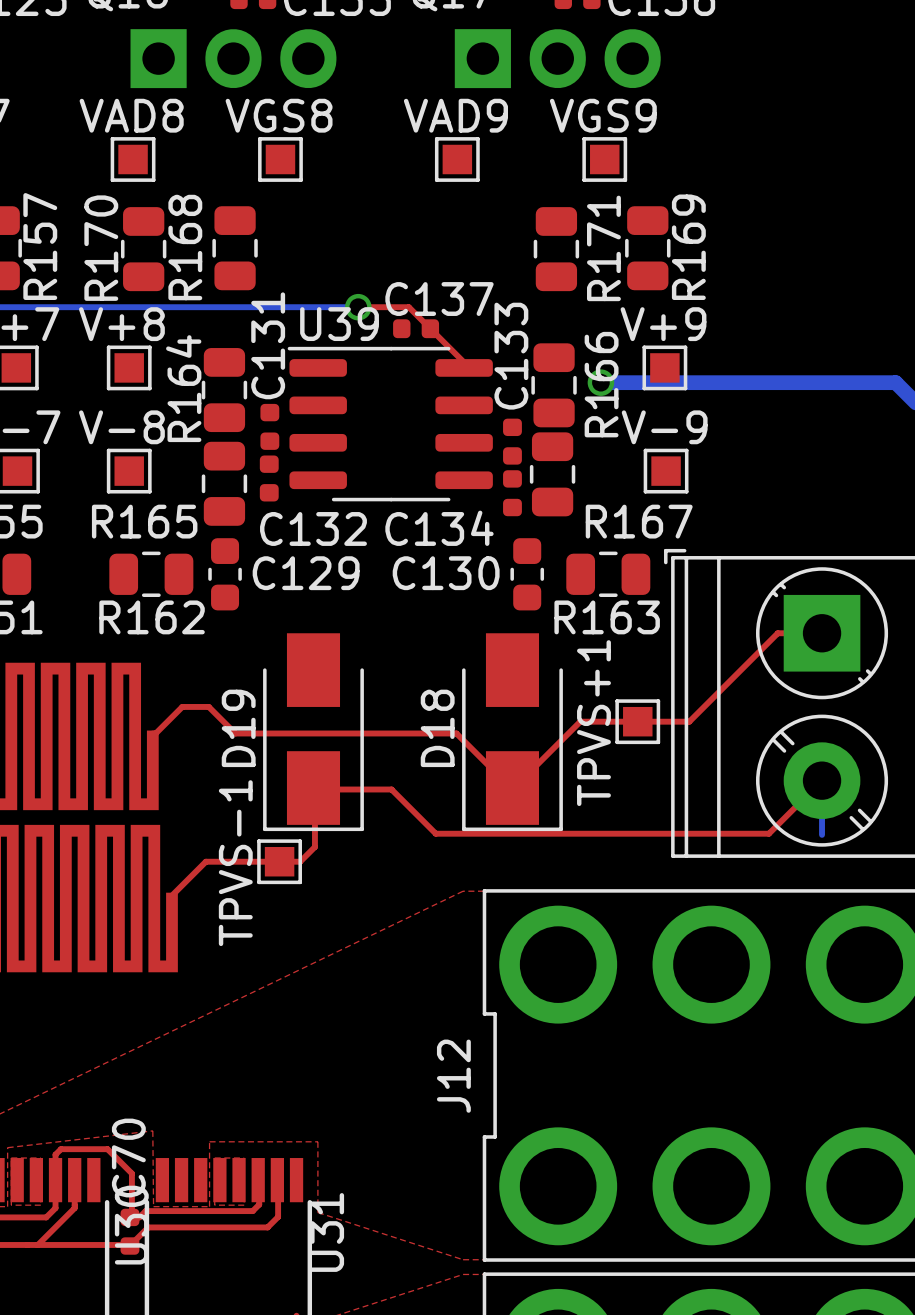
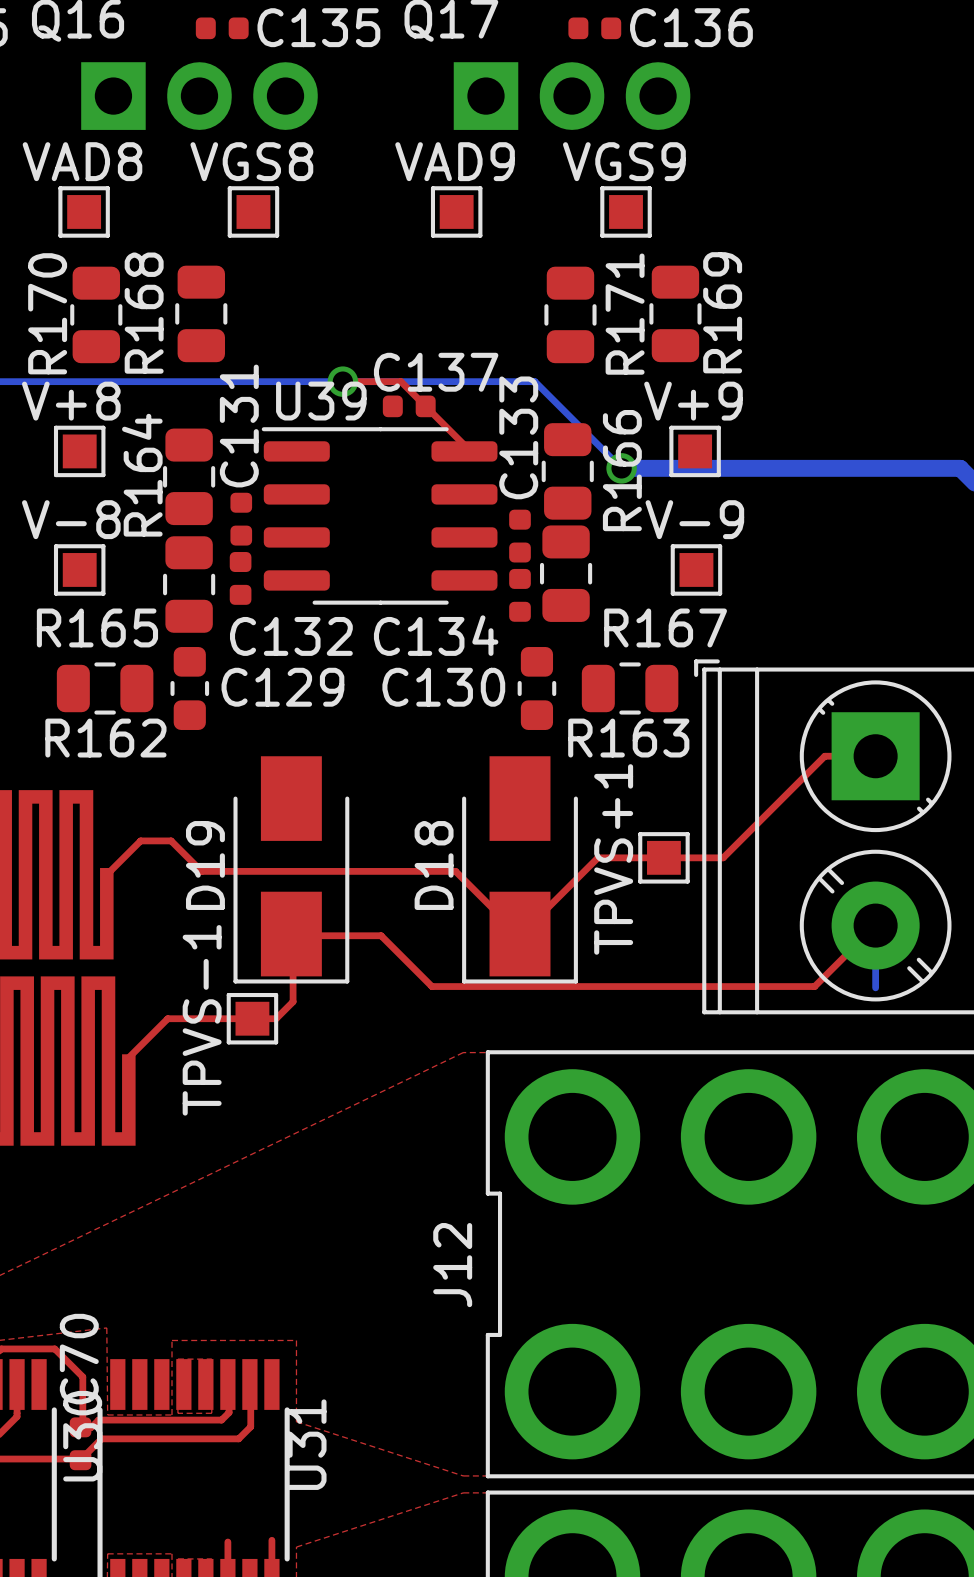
bottom track: none -> (342, 381) (534, 381) (621, 468)

